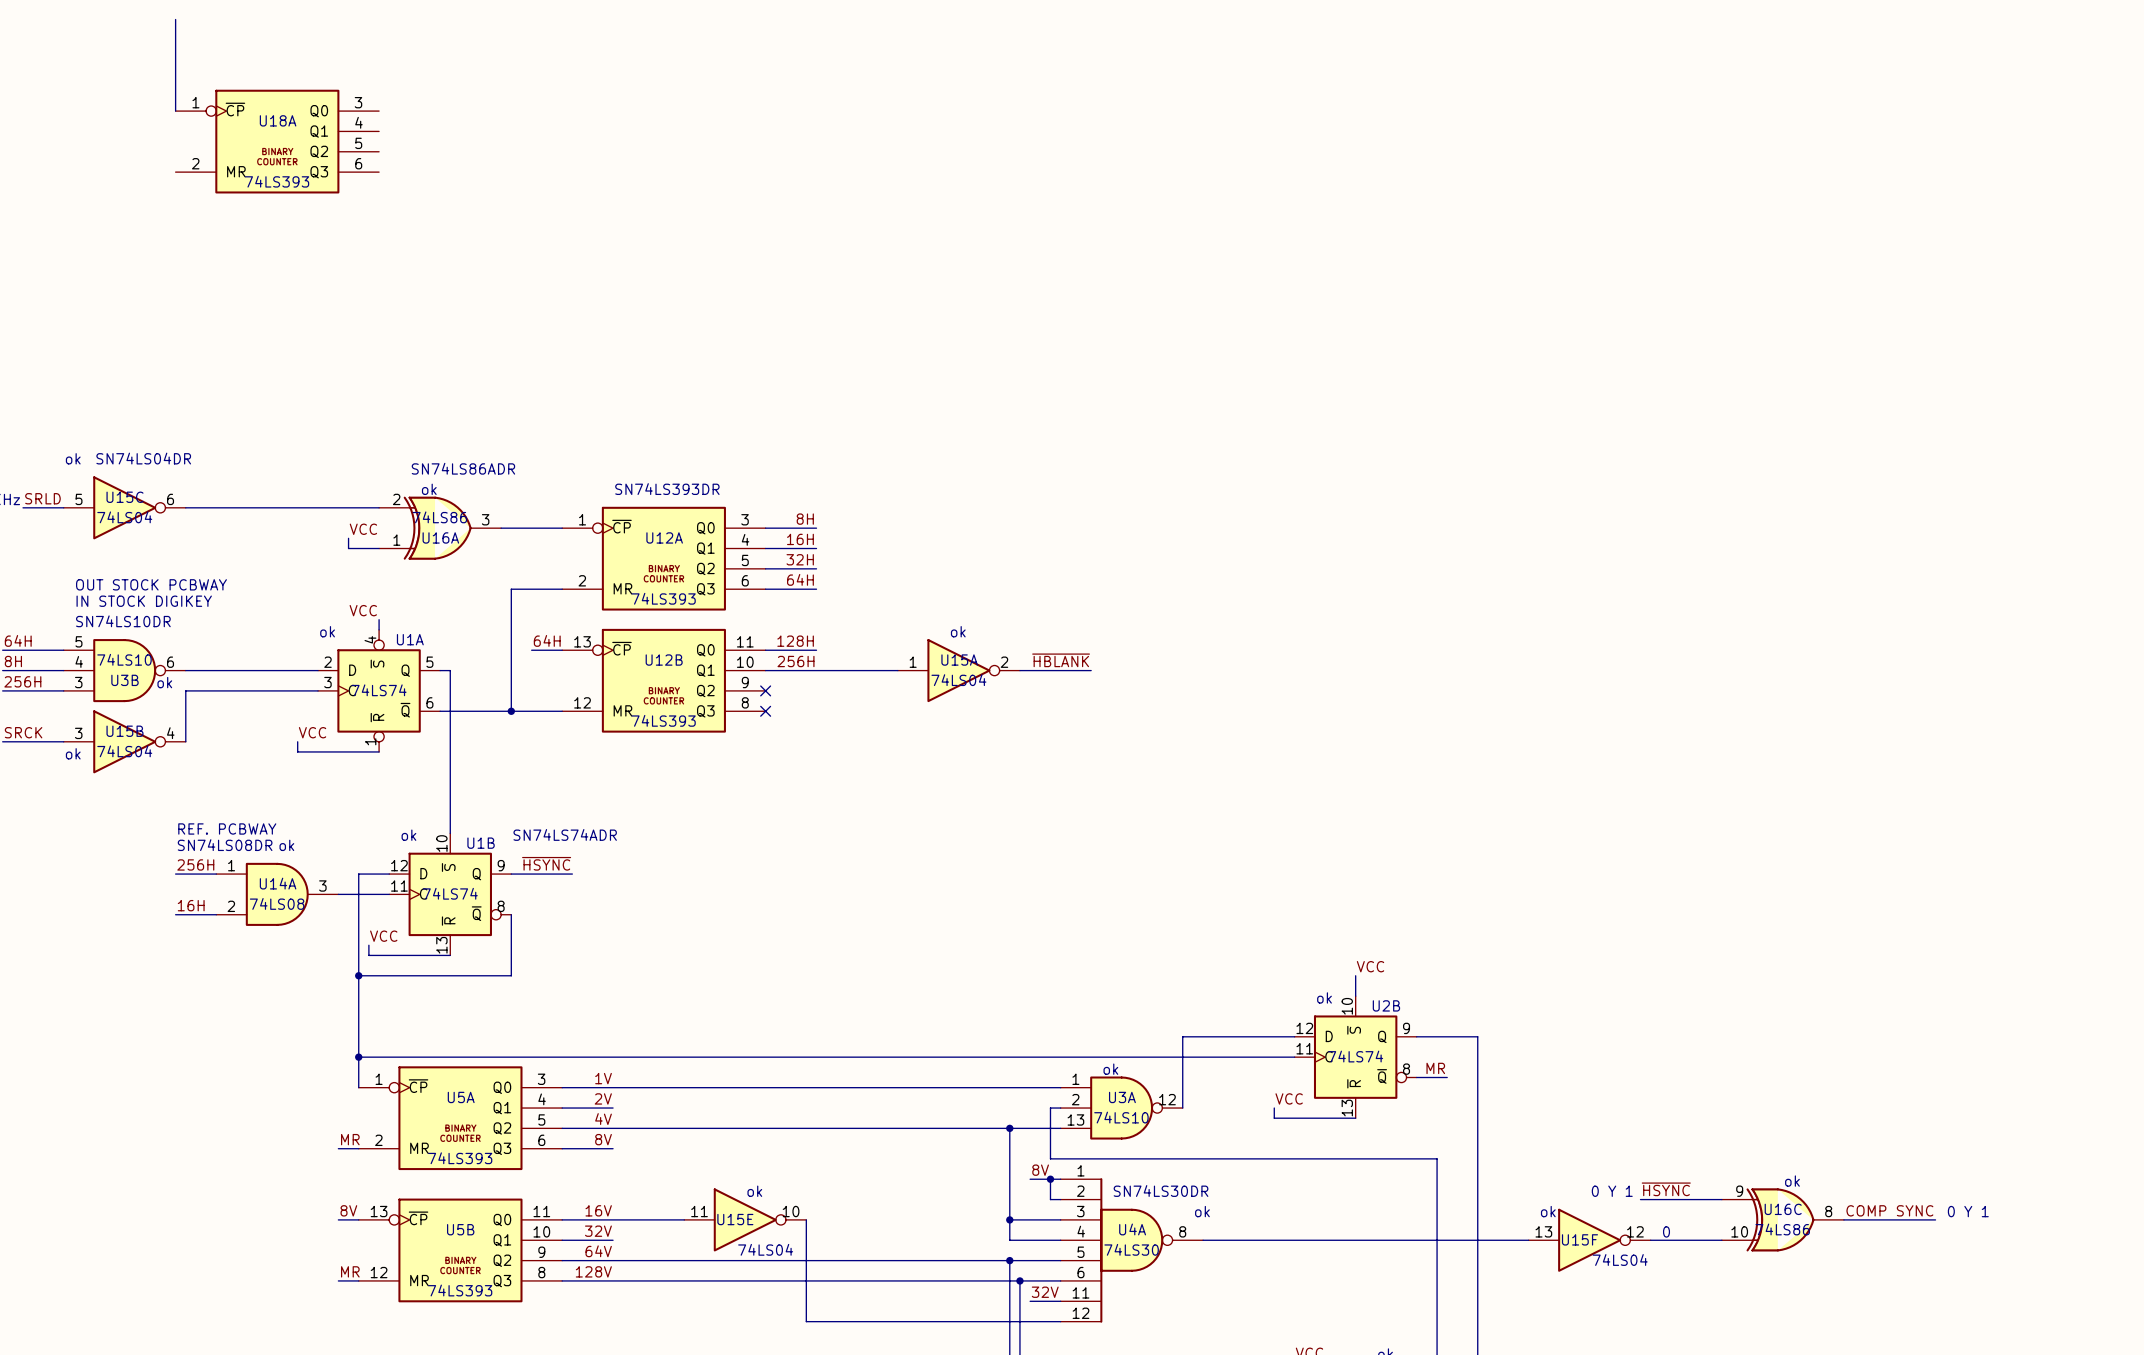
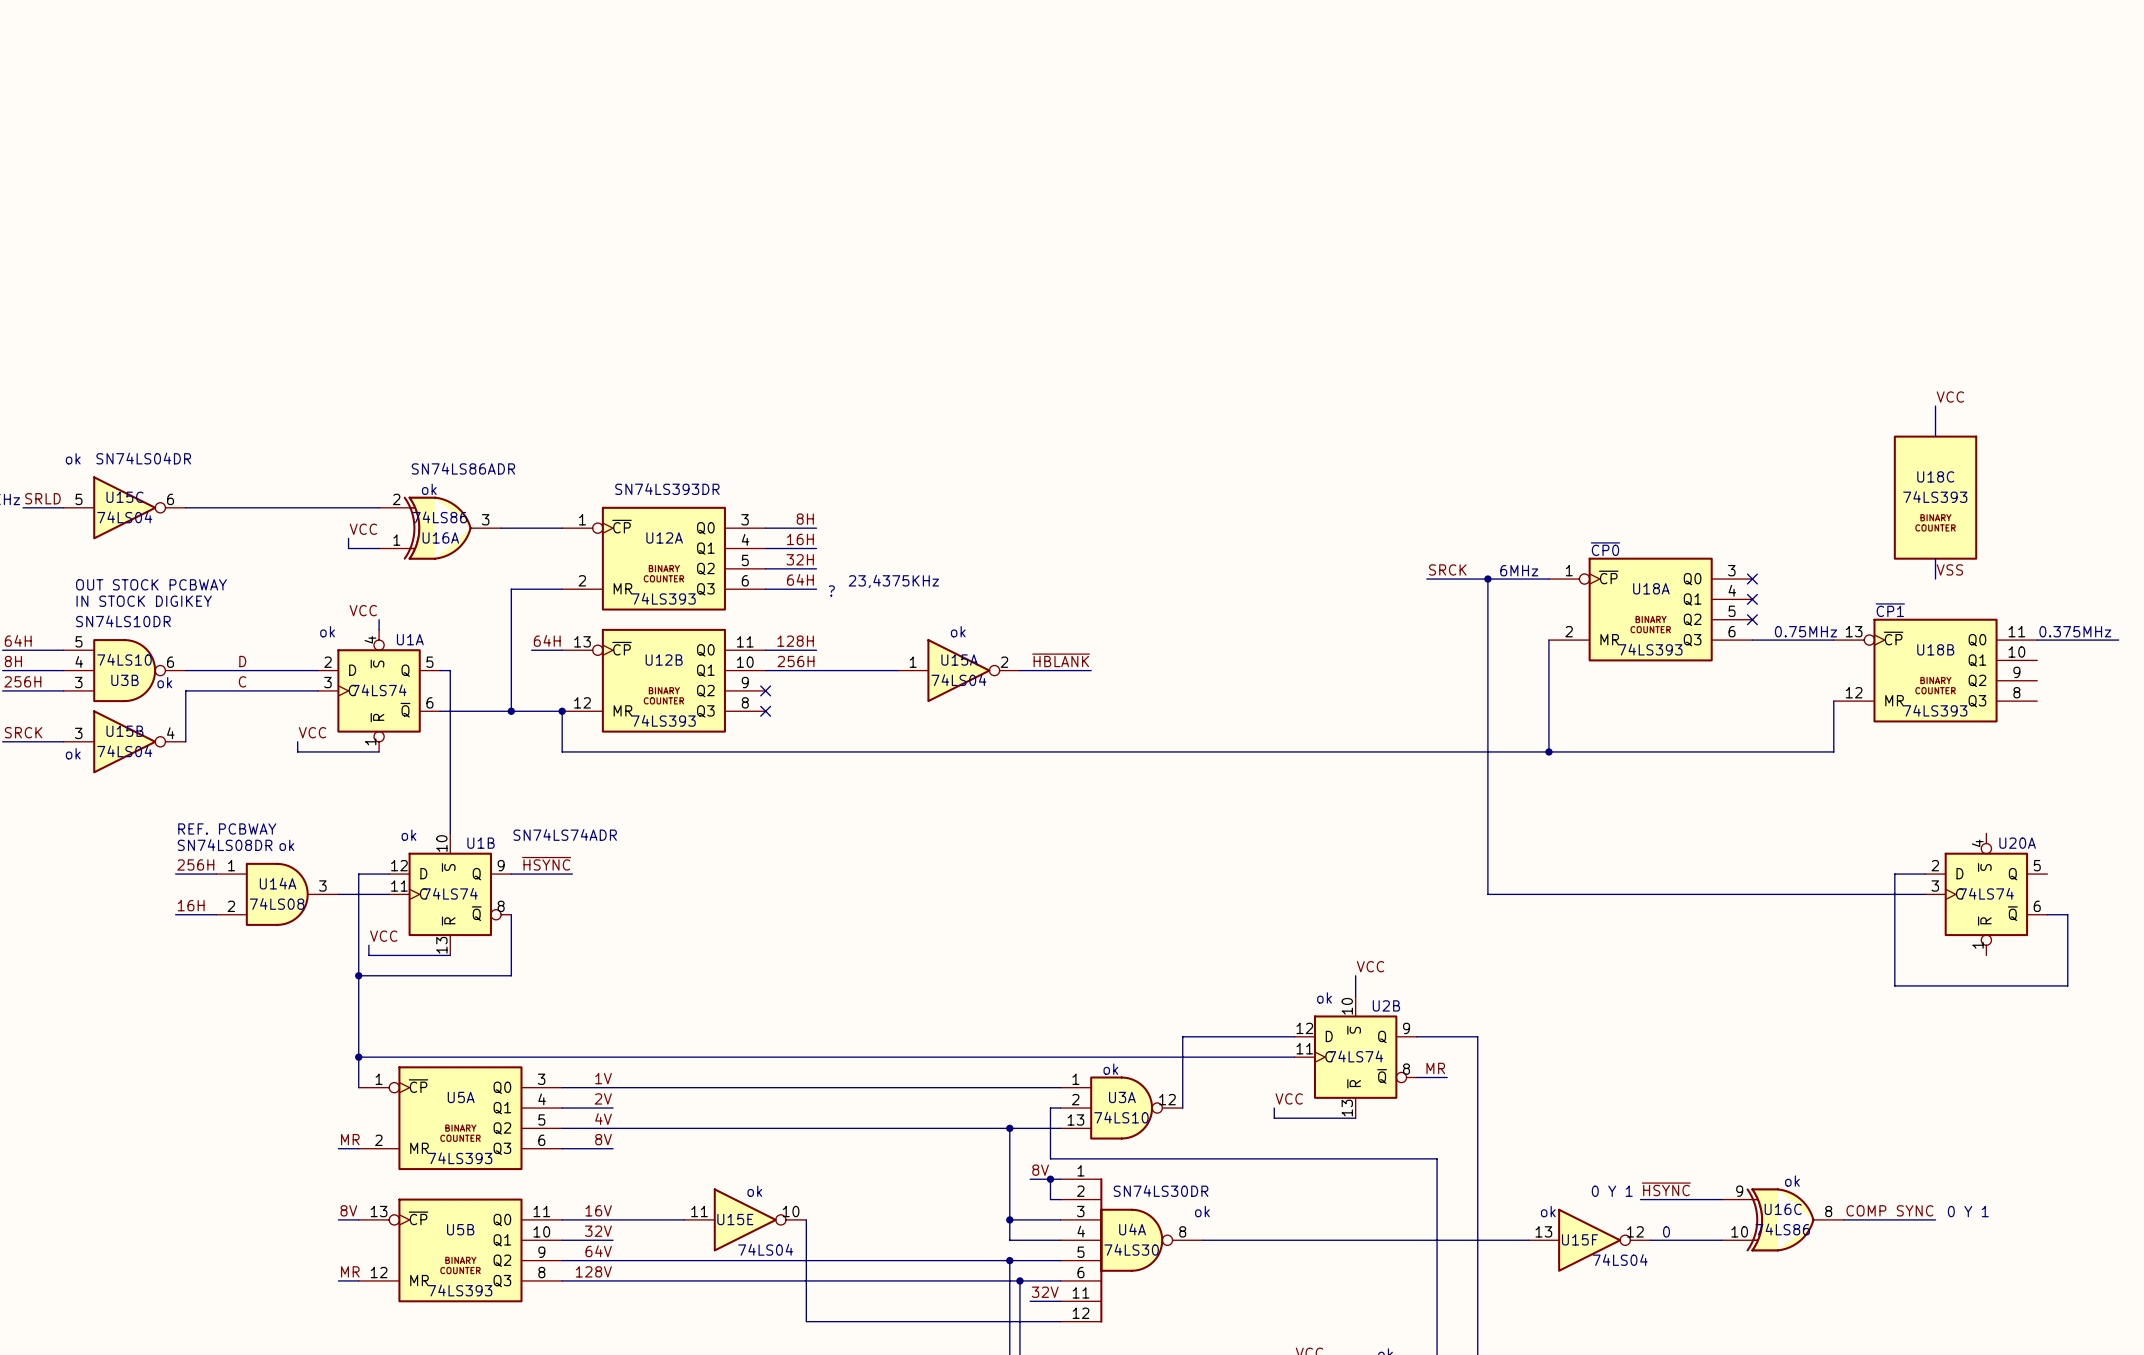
wire: (175, 19) (175, 111) -> none
U18A position: (277, 141) -> (1650, 609)
label: none -> VCC (1950, 397)
wire: none -> (1935, 406) (1935, 436)
U18C: none -> 74LS393 (1935, 497)
text: none -> ~{CP0} (1605, 549)
wire: none -> (1935, 558) (1935, 579)
label: none -> SRCK (1447, 569)
label: none -> VSS (1949, 569)
text: none -> 6MHz (1519, 570)
wire: none -> (1426, 579) (1548, 579)
wire: none -> (1487, 579) (1487, 894) (1925, 894)
junction: none -> (1487, 579)
no-connect mark: none -> (1752, 579)
text: none -> 23,4375KHz (893, 581)
text: none -> ? (831, 591)
no-connect mark: none -> (1752, 599)
text: none -> ~{CP1} (1890, 610)
no-connect mark: none -> (1752, 619)
text: none -> 0.75MHz (1806, 631)
text: none -> 0.375MHz (2075, 631)
wire: none -> (1548, 640) (1548, 751)
wire: none -> (1752, 640) (1833, 640)
wire: none -> (2037, 640) (2118, 640)
label: none -> D (242, 661)
U18B: none -> 74LS393 (1935, 670)
label: none -> C (242, 681)
wire: none -> (1833, 701) (1833, 751) (562, 751) (562, 711)
junction: none -> (562, 711)
junction: none -> (1548, 751)
wire: none -> (1925, 874) (1894, 874) (1894, 985) (2067, 985) (2067, 914) (2047, 914)
U20A: none -> 74LS74 (1986, 894)

